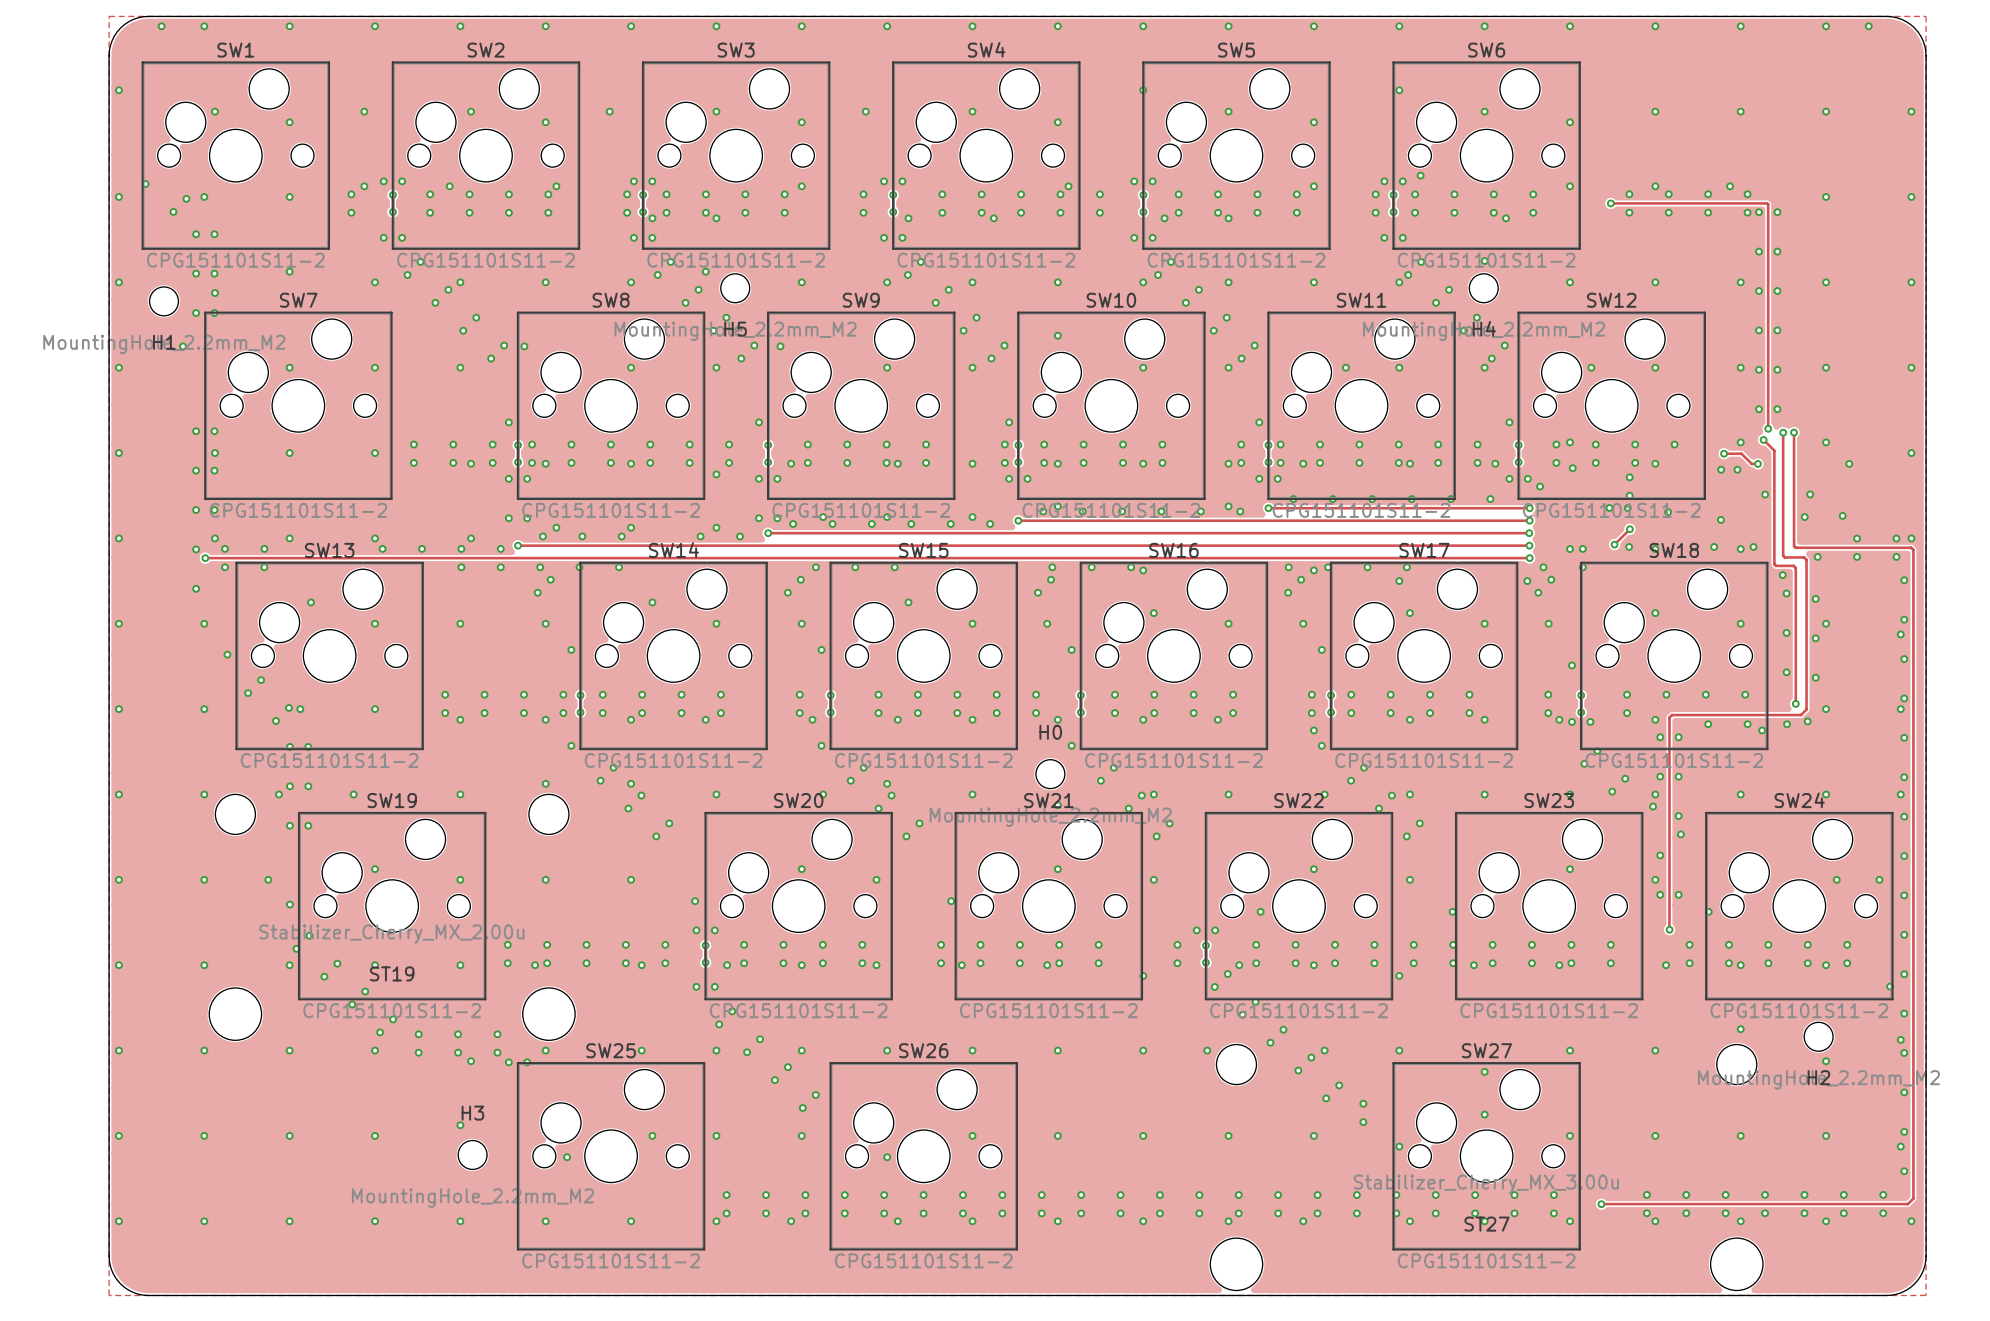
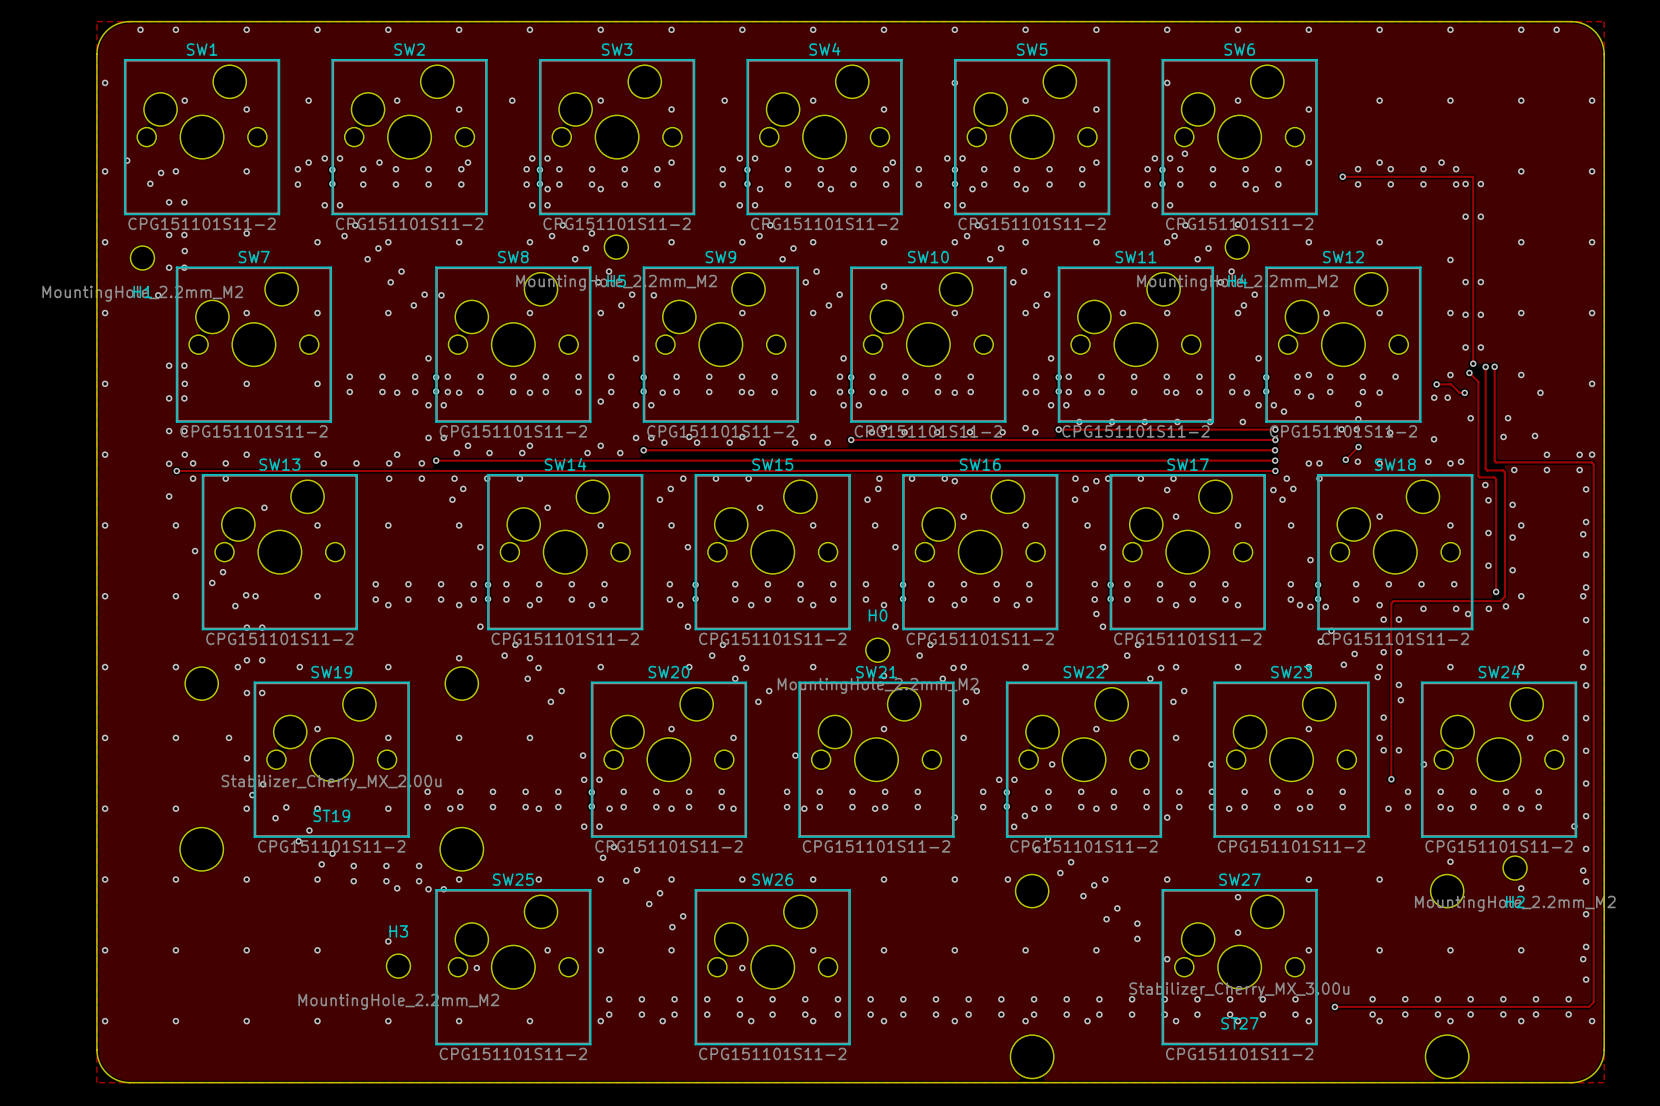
via: (1740, 282) -> none
via: (1759, 291) -> none
via: (1777, 291) -> none
via: none -> (1450, 259)

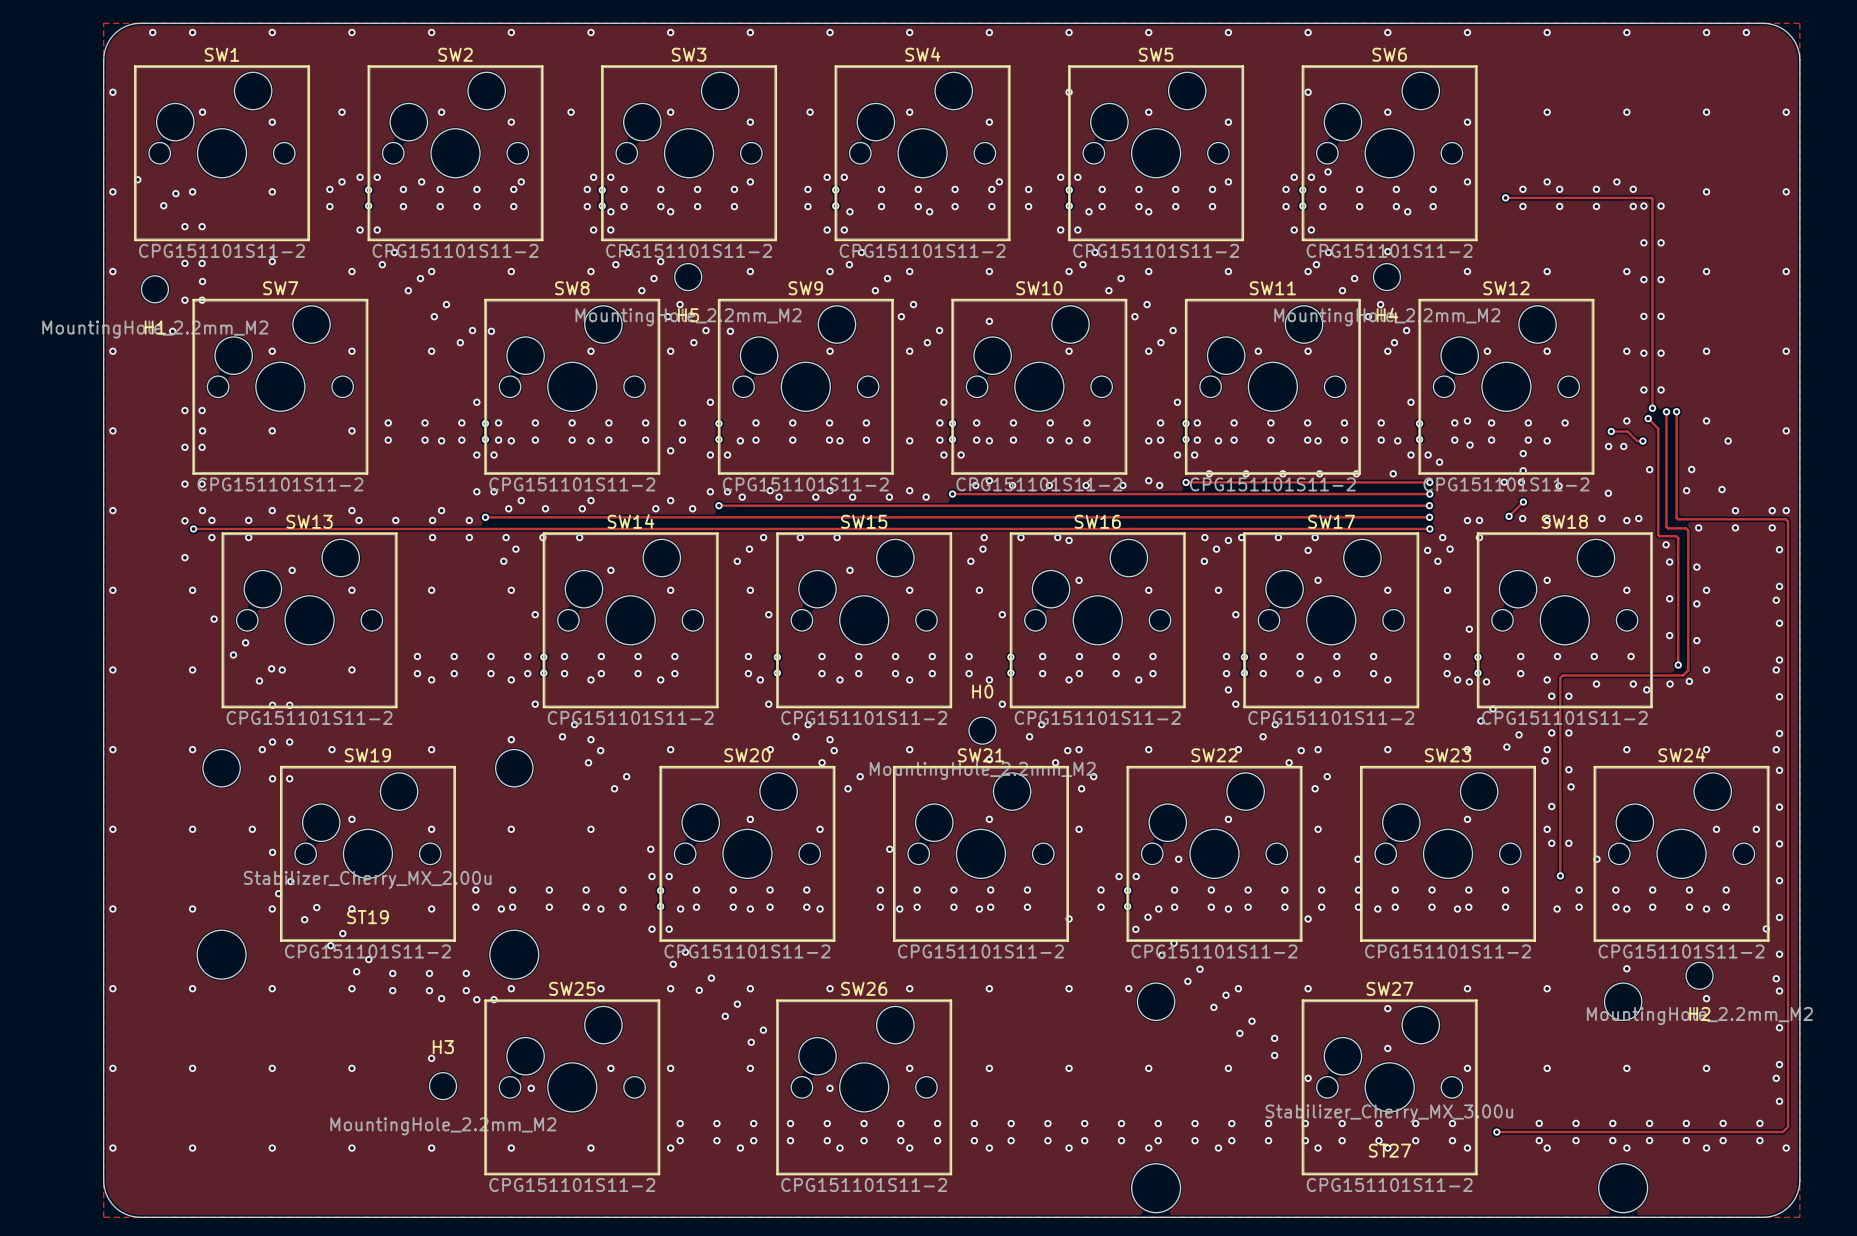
via: none -> (1626, 271)
via: none -> (1643, 279)
via: none -> (1661, 279)
via: (1450, 259) -> none

